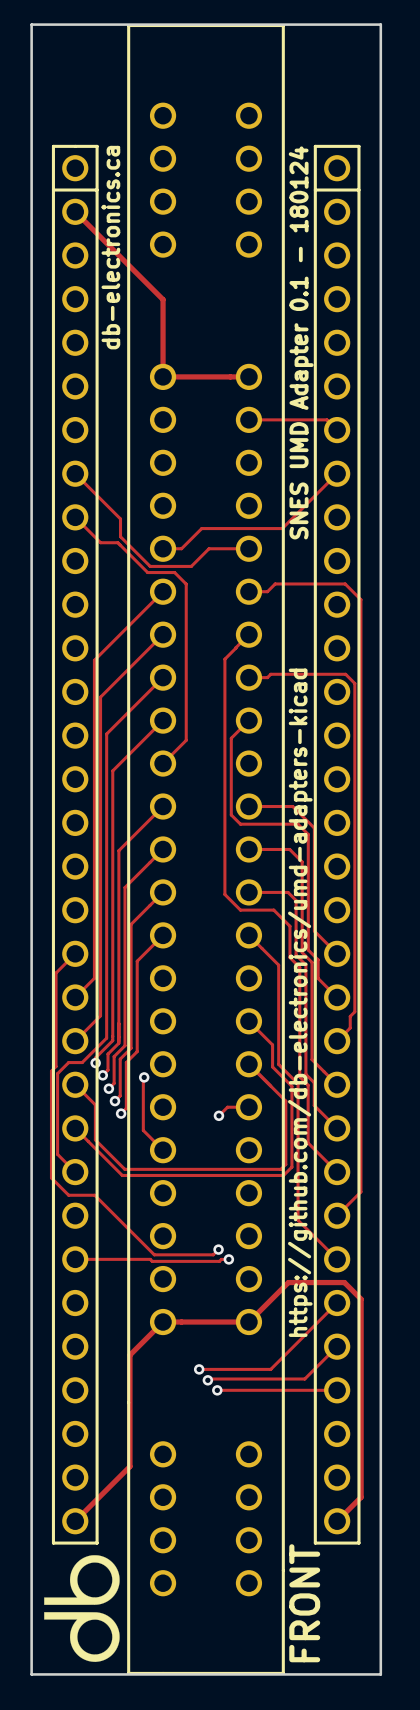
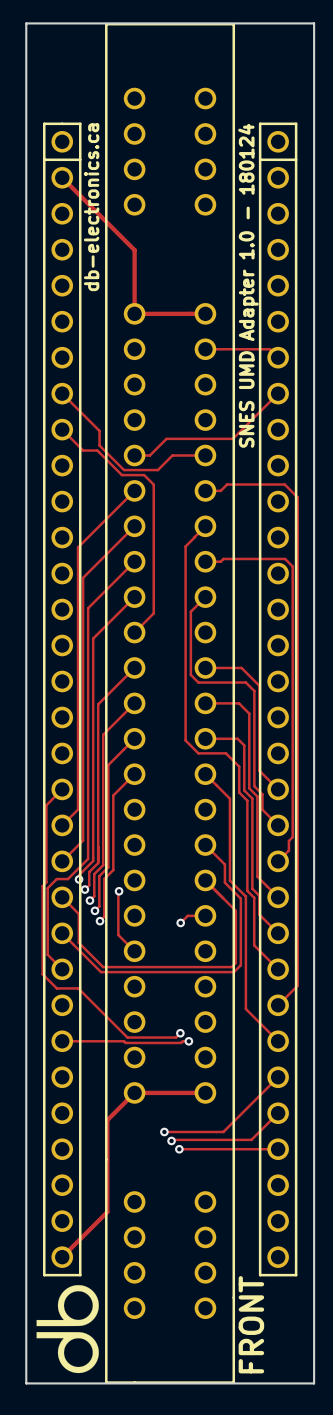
text: SNES UMD Adapter 0.1 - 180124 (301, 342) -> SNES UMD Adapter 1.0 - 180124 (248, 285)
text: https://github.com/db-electronics/umd-adapters-kicad (300, 1002) -> none
track: (248, 1322) (288, 1282) (344, 1282) (361, 1299) (361, 1497) (337, 1521) -> none

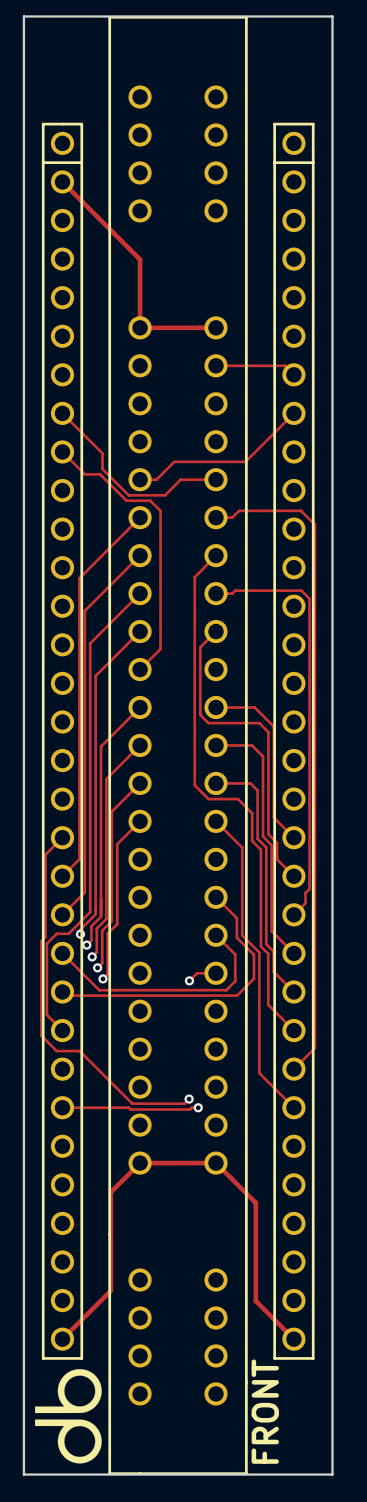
text: db-electronics.ca (91, 207) -> none
text: SNES UMD Adapter 1.0 - 180124 (248, 285) -> none
via: (119, 891) -> none
track: (120, 892) (118, 893) (118, 935) (134, 951) -> none
track: (223, 898) (235, 910) (235, 963) (231, 967) (103, 967) (78, 942) (78, 913) -> (235, 954) (235, 981) (226, 990) (99, 990) (80, 971)
track: (240, 920) (240, 965) (233, 972) (101, 972) (62, 933) -> (253, 978) (237, 995) (70, 995) (67, 991) (62, 991)
track: (278, 1077) (223, 1131) (164, 1131) -> none
track: none -> (215, 1163) (255, 1202) (255, 1301) (293, 1339)
track: (278, 1113) (251, 1139) (171, 1140) -> none
via: (164, 1131) -> none
via: (171, 1140) -> none
track: (179, 1149) (278, 1149) -> none
via: (179, 1149) -> none

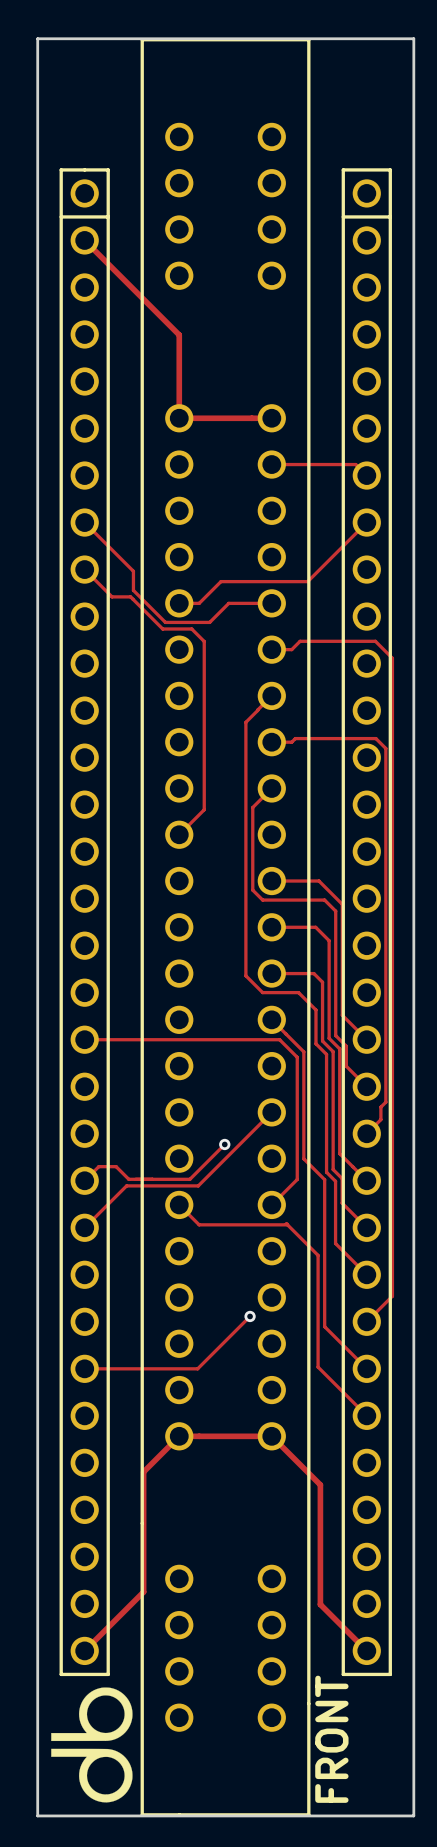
track: (140, 517) (79, 578) (79, 859) (62, 876) -> none
track: (140, 555) (84, 610) (84, 892) (62, 914) -> none
track: (140, 593) (90, 643) (90, 912) (68, 933) (56, 933) (46, 943) (46, 1014) (62, 1030) -> none
track: (140, 631) (95, 675) (95, 914) (80, 929) (80, 934) -> none
track: (140, 707) (101, 746) (101, 916) (91, 926) (91, 940) (86, 945) -> none
track: (140, 745) (106, 779) (106, 918) (96, 928) (96, 952) (92, 956) -> none
track: (140, 783) (111, 811) (111, 921) (102, 930) (102, 963) (97, 967) -> none
track: (140, 821) (117, 844) (117, 924) (107, 933) (107, 974) (102, 978) -> none
track: (62, 837) (45, 854) (45, 937) (41, 941) (41, 1035) (56, 1051) (79, 1051) (132, 1103) (184, 1103) (189, 1099) -> none
track: (215, 897) (236, 918) -> (84, 1039) (279, 1039) (297, 1057) (297, 1137)
via: none -> (224, 1144)
via: (80, 934) -> none
track: (215, 935) (235, 954) (235, 981) (226, 990) (99, 990) (62, 953) -> (224, 1144) (189, 1179) (128, 1179) (116, 1166) (98, 1166) (84, 1180)
track: (236, 937) (253, 954) (253, 978) (237, 995) (70, 995) (67, 991) (62, 991) -> (271, 1112) (198, 1185) (126, 1185) (84, 1227)
via: (86, 945) -> none
via: (92, 956) -> none
via: (97, 967) -> none
track: none -> (179, 1204) (199, 1224) (287, 1224) (318, 1255) (318, 1367) (366, 1415)
track: (215, 973) (197, 973) (189, 980) -> (271, 1204) (297, 1179) (297, 1161)
via: (102, 978) -> none
via: (189, 980) -> none
via: none -> (250, 1316)
via: (189, 1099) -> none
track: (128, 1107) (130, 1109) (189, 1109) (198, 1107) -> (165, 1368) (197, 1368) (250, 1316)
via: (198, 1107) -> none

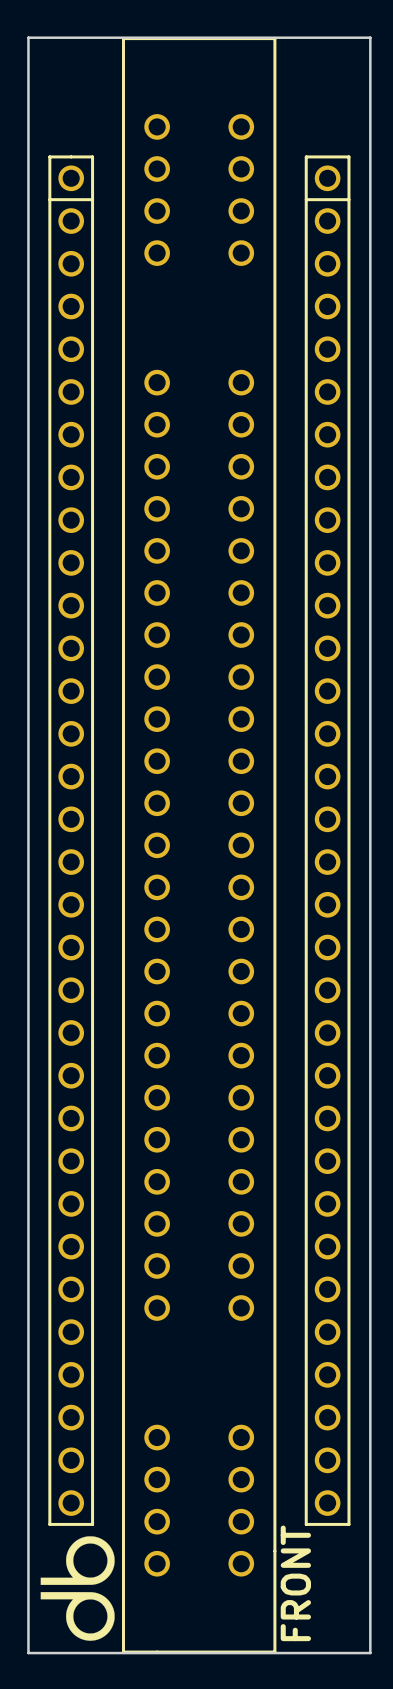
track: (84, 240) (179, 335) (179, 418) (271, 418) -> none
track: (271, 464) (355, 464) (366, 475) -> none
track: (84, 522) (133, 571) (133, 590) (165, 622) (209, 622) (228, 603) (271, 603) -> none
track: (366, 522) (307, 581) (220, 581) (199, 603) (179, 603) -> none
track: (84, 569) (112, 596) (130, 596) (162, 628) (191, 628) (204, 641) (204, 809) (179, 834) -> none
track: (271, 649) (291, 649) (300, 641) (375, 641) (392, 658) (392, 1296) (366, 1321) -> none
track: (271, 695) (245, 722) (245, 975) (262, 992) (298, 992) (315, 1010) (315, 1043) (326, 1054) (326, 1172) (335, 1181) (335, 1243) (366, 1274) -> none
track: (271, 742) (291, 742) (295, 738) (375, 738) (385, 748) (385, 1102) (380, 1107) (380, 1119) (366, 1133) -> none
track: (271, 788) (252, 807) (252, 890) (262, 900) (324, 900) (335, 911) (335, 1035) (346, 1046) (346, 1066) (366, 1086) -> none
track: (271, 881) (319, 881) (342, 904) (342, 1015) (366, 1039) -> none
track: (271, 927) (315, 927) (329, 940) (329, 1038) (339, 1048) (339, 1153) (366, 1180) -> none
track: (271, 973) (313, 973) (322, 982) (322, 1041) (333, 1051) (333, 1169) (342, 1178) (342, 1203) (366, 1227) -> none
track: (271, 1019) (303, 1051) (303, 1158) (324, 1179) (324, 1326) (366, 1368) -> none
track: (84, 1039) (279, 1039) (297, 1057) (297, 1179) (271, 1204) -> none
track: (271, 1112) (198, 1185) (126, 1185) (84, 1227) -> none
track: (224, 1144) (189, 1179) (128, 1179) (116, 1166) (98, 1166) (84, 1180) -> none
via: (224, 1144) -> none
track: (179, 1204) (199, 1224) (287, 1224) (318, 1255) (318, 1367) (366, 1415) -> none
track: (286, 1223) (286, 1223) -> none
track: (250, 1316) (197, 1368) (84, 1368) -> none
via: (250, 1316) -> none
track: (84, 1650) (143, 1592) (143, 1471) (179, 1436) (271, 1436) (320, 1484) (320, 1604) (366, 1650) -> none

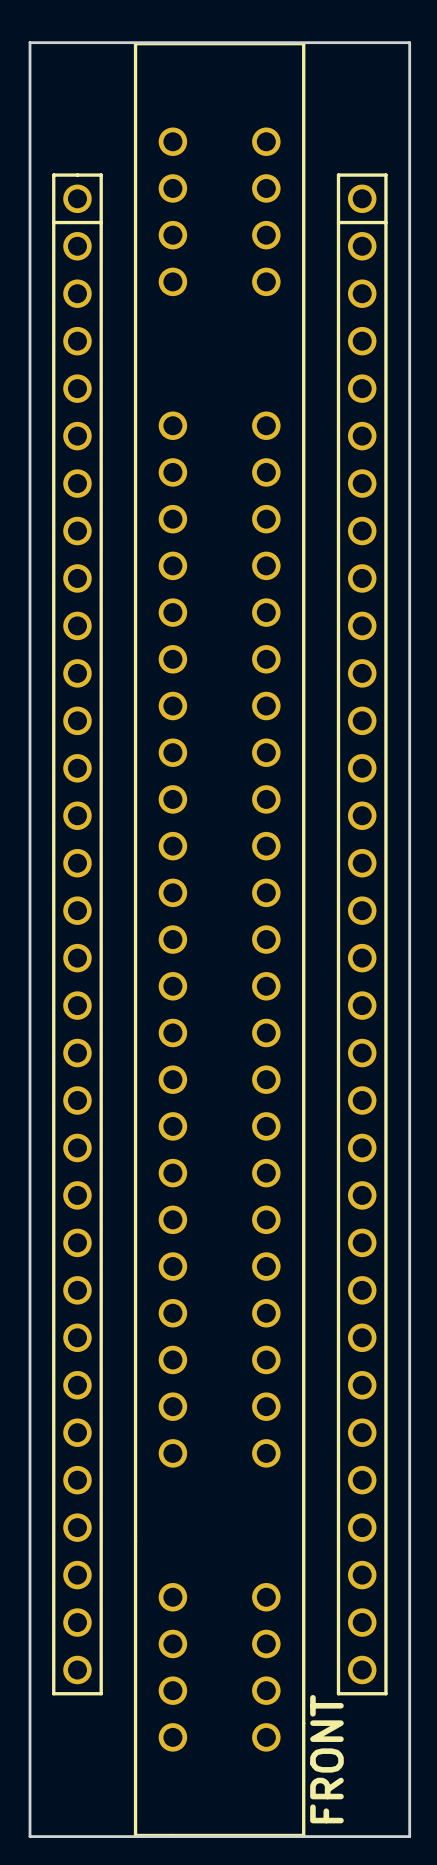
drawing: [40, 1536, 115, 1641] -> none

